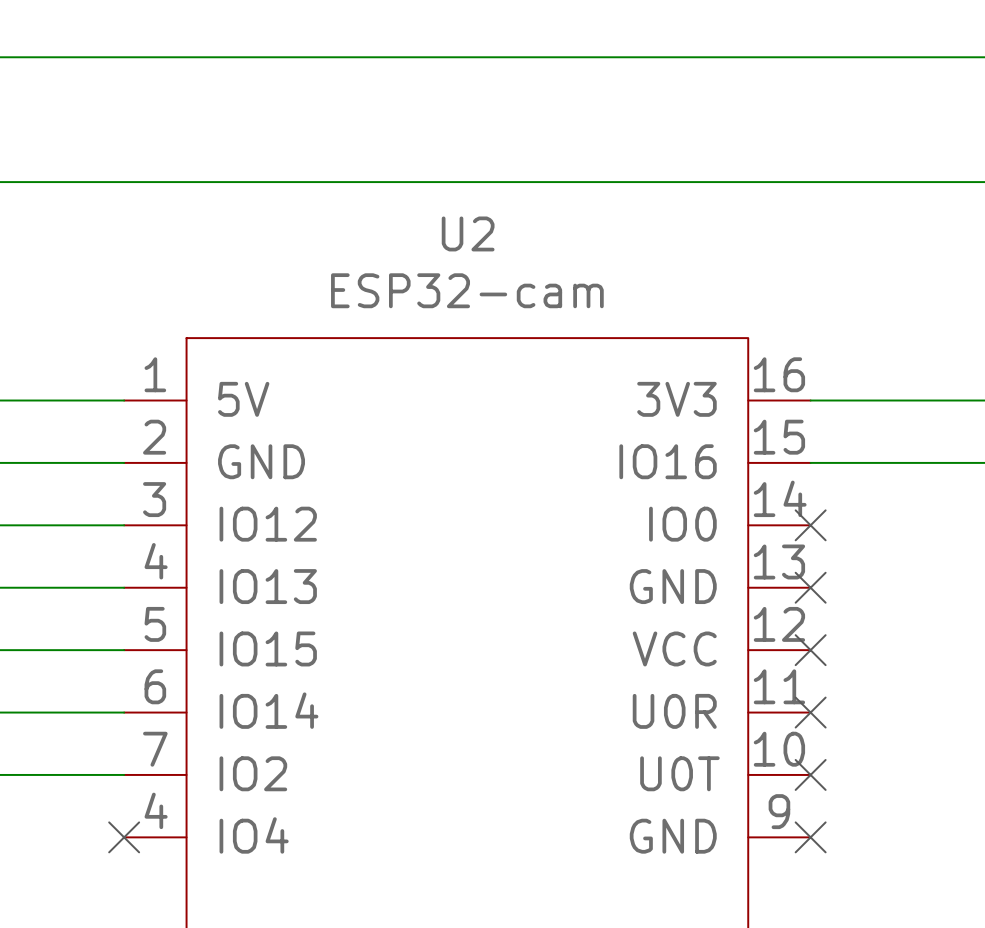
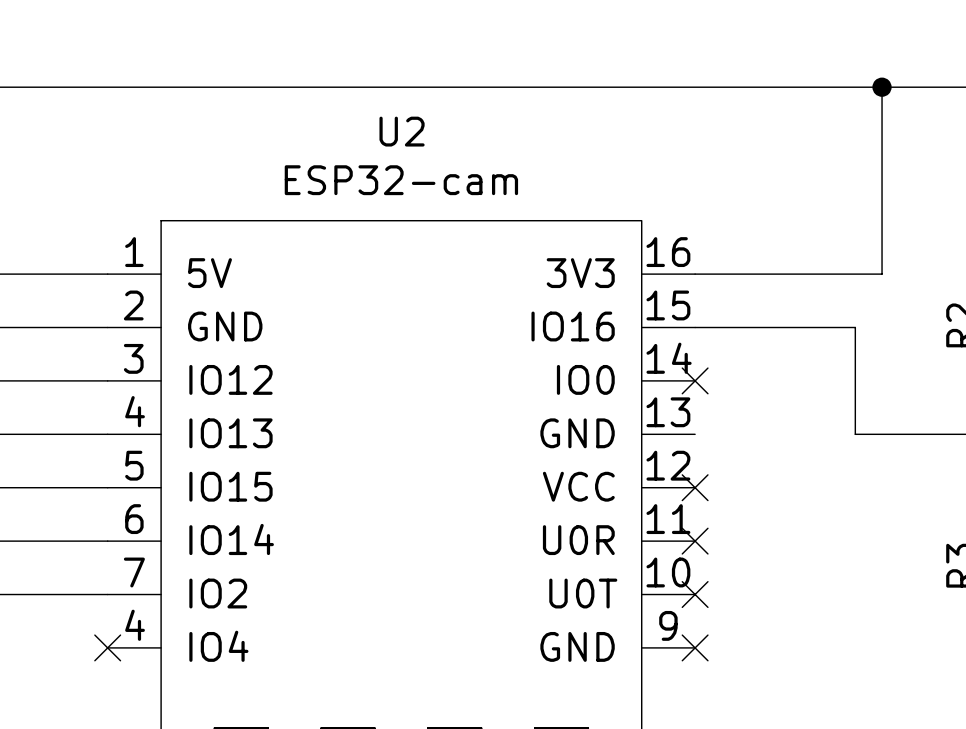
no-connect mark: (810, 587) -> none

